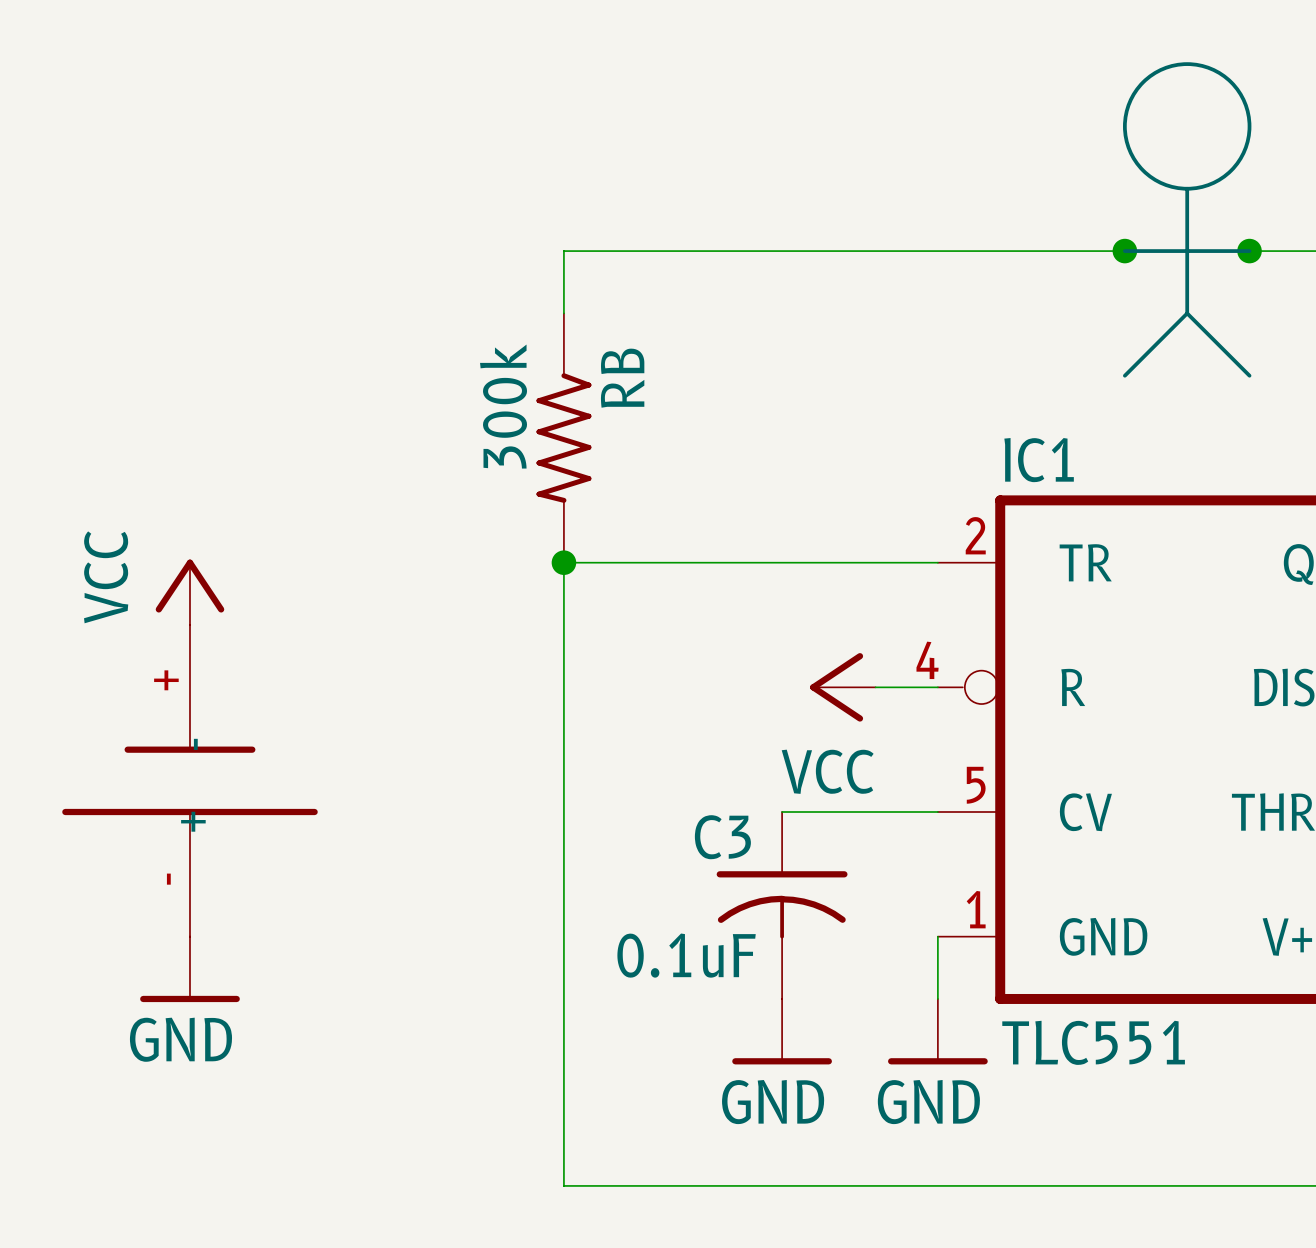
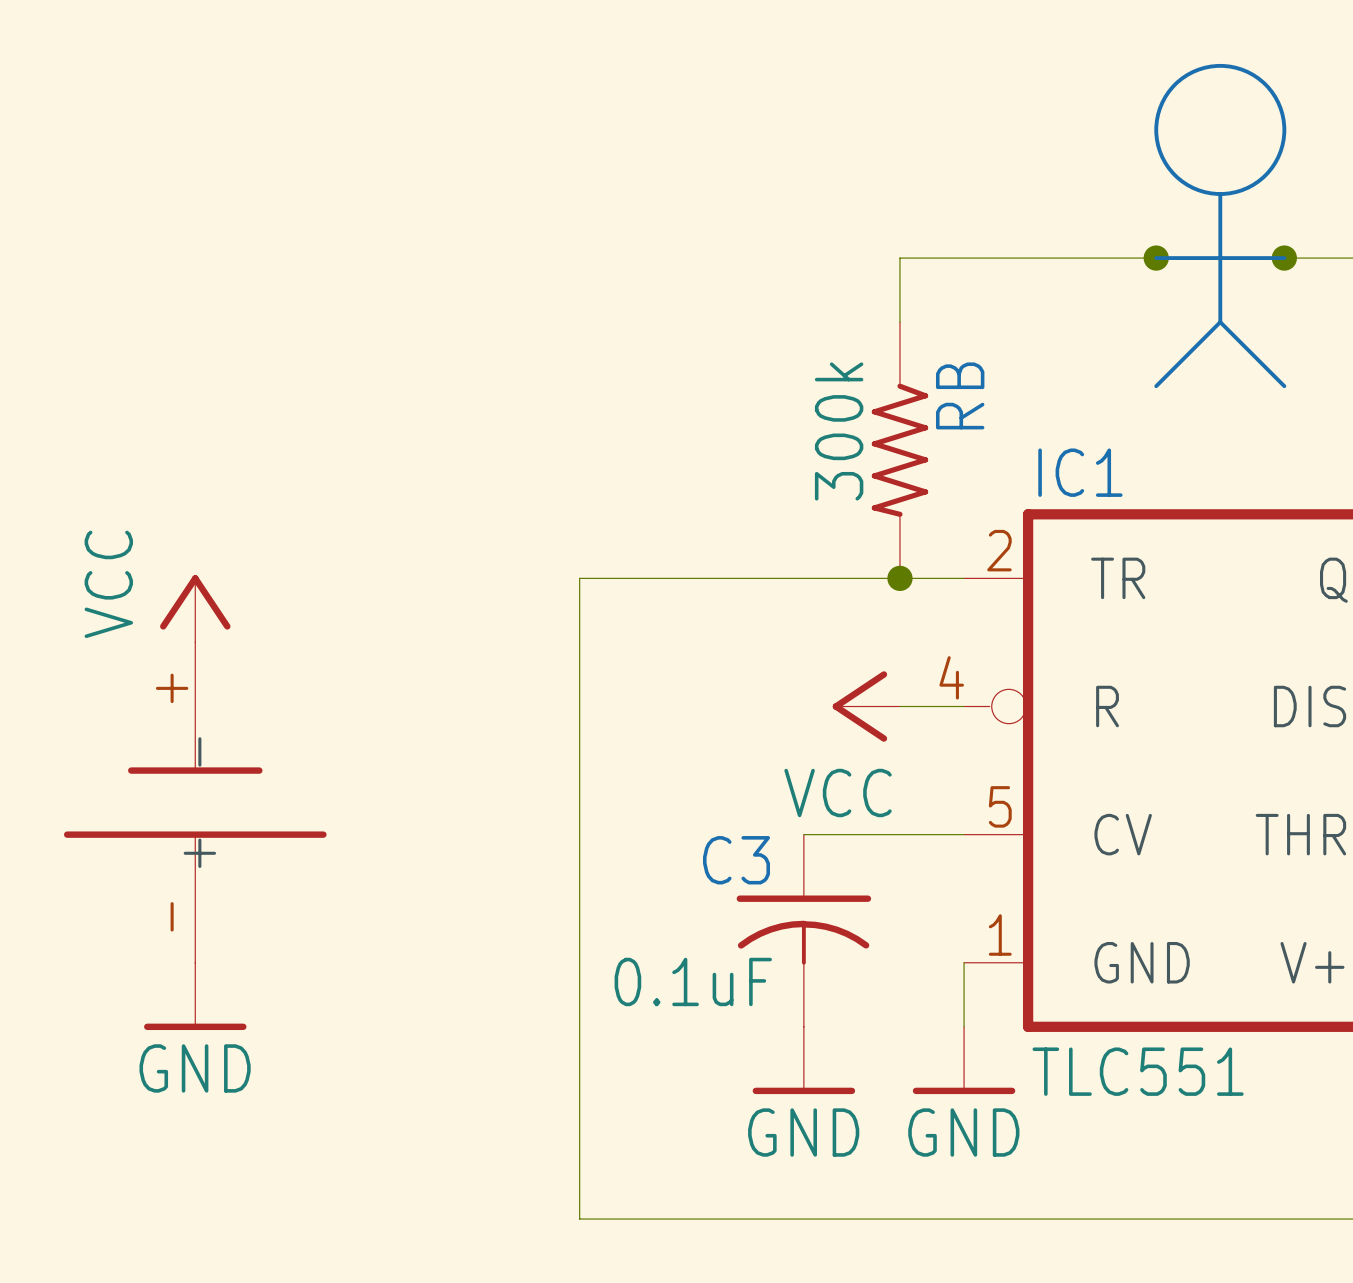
wire: (875, 251) (563, 251) (563, 313) -> (899, 258) (899, 322)
RB position: (563, 438) -> (899, 450)
junction: (563, 562) -> none
junction: none -> (899, 578)

